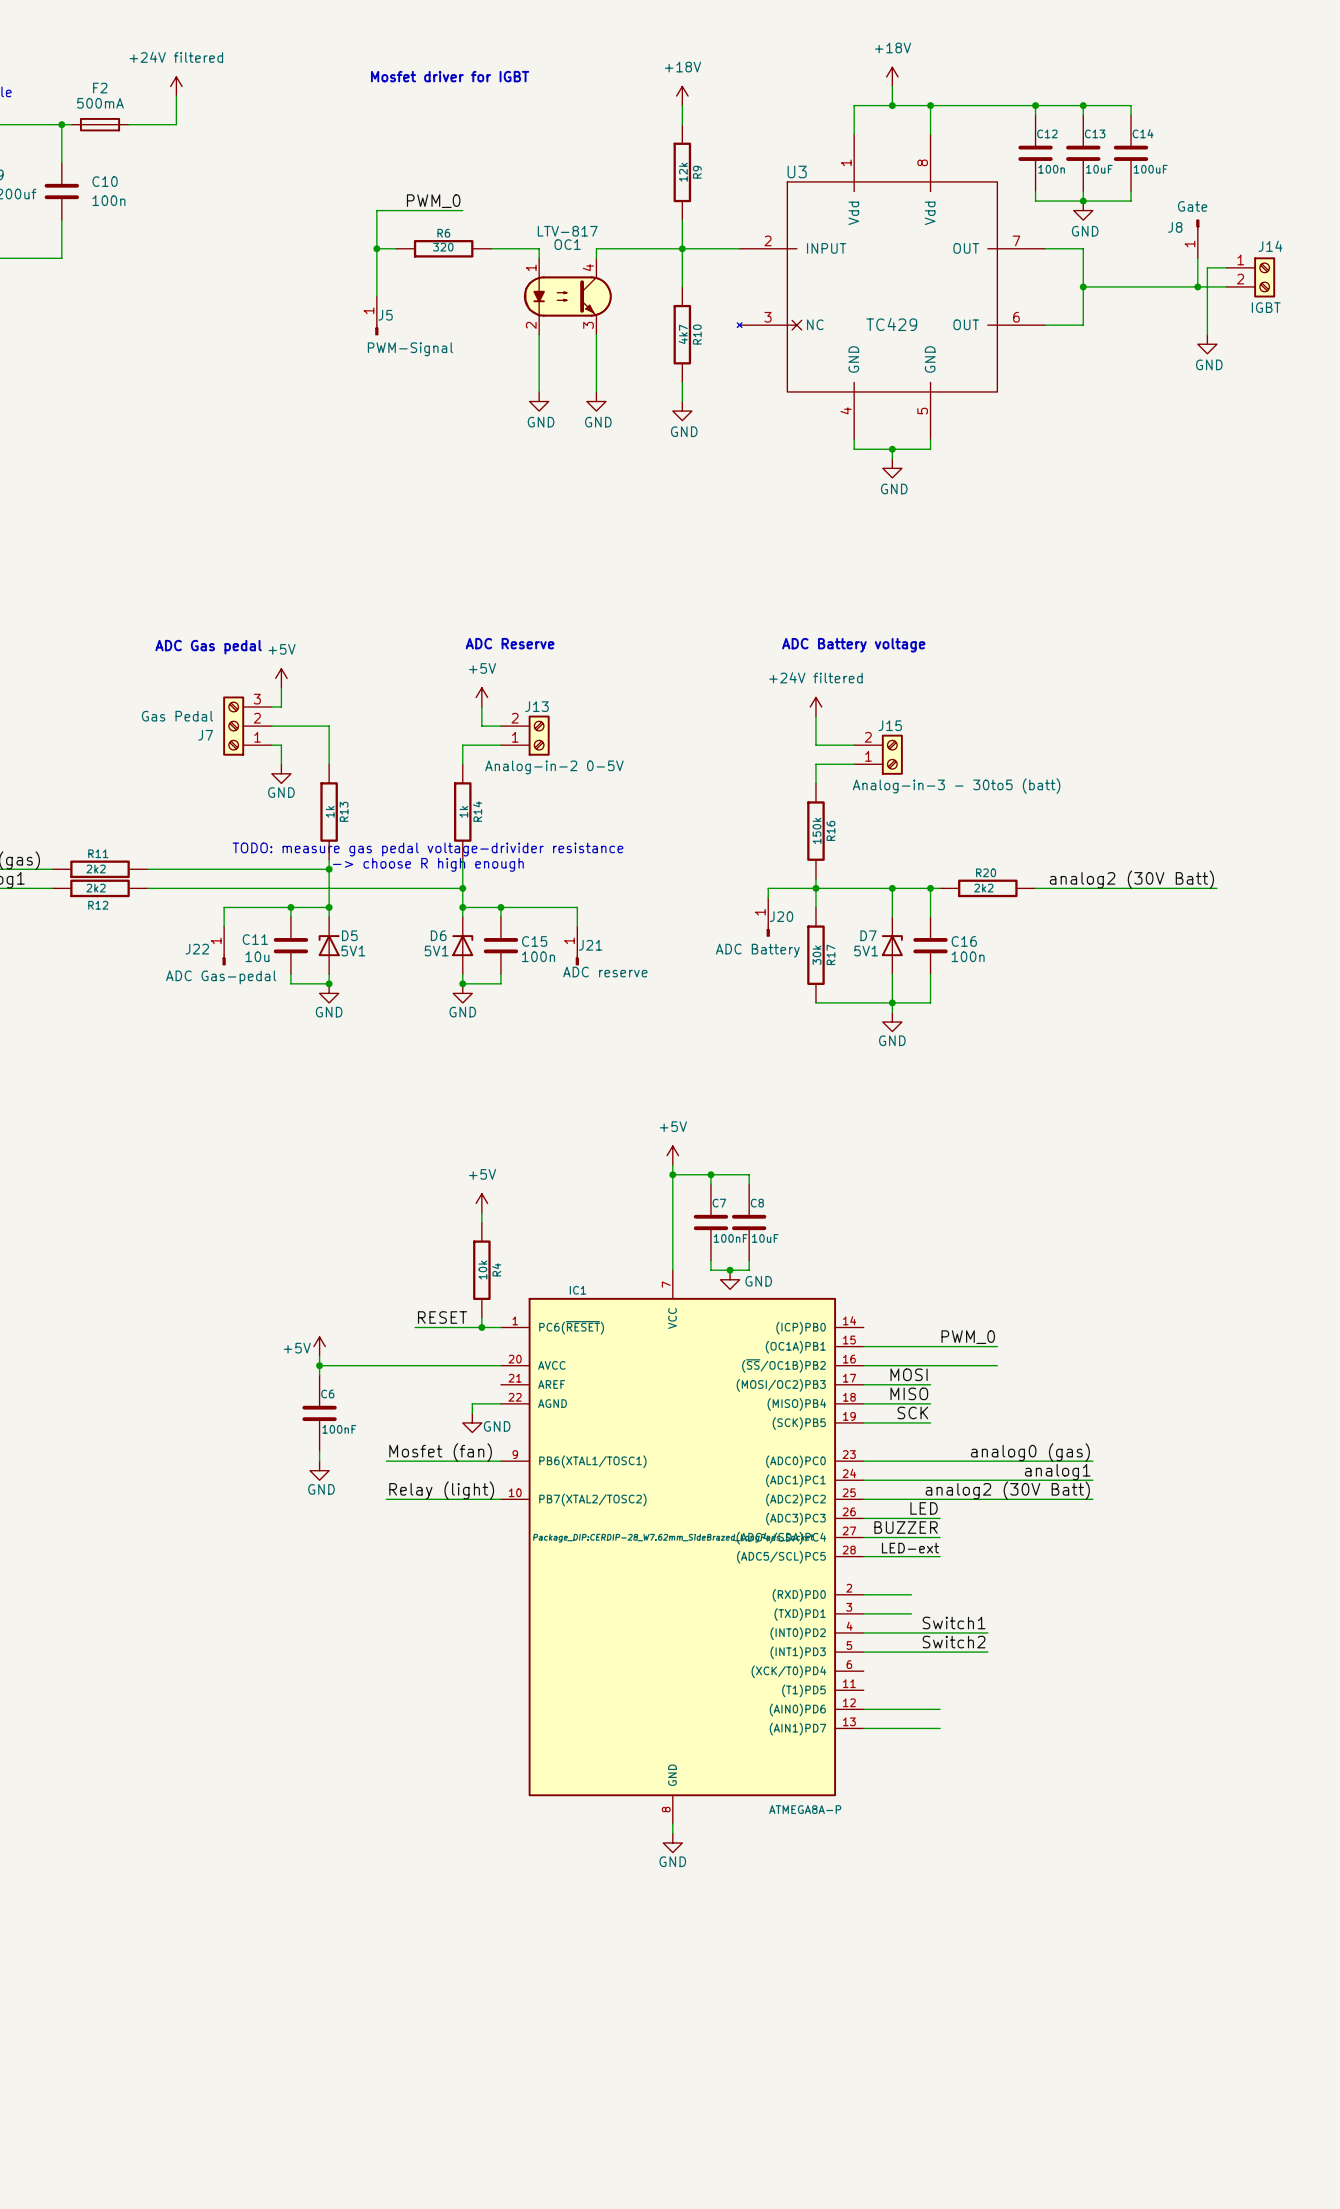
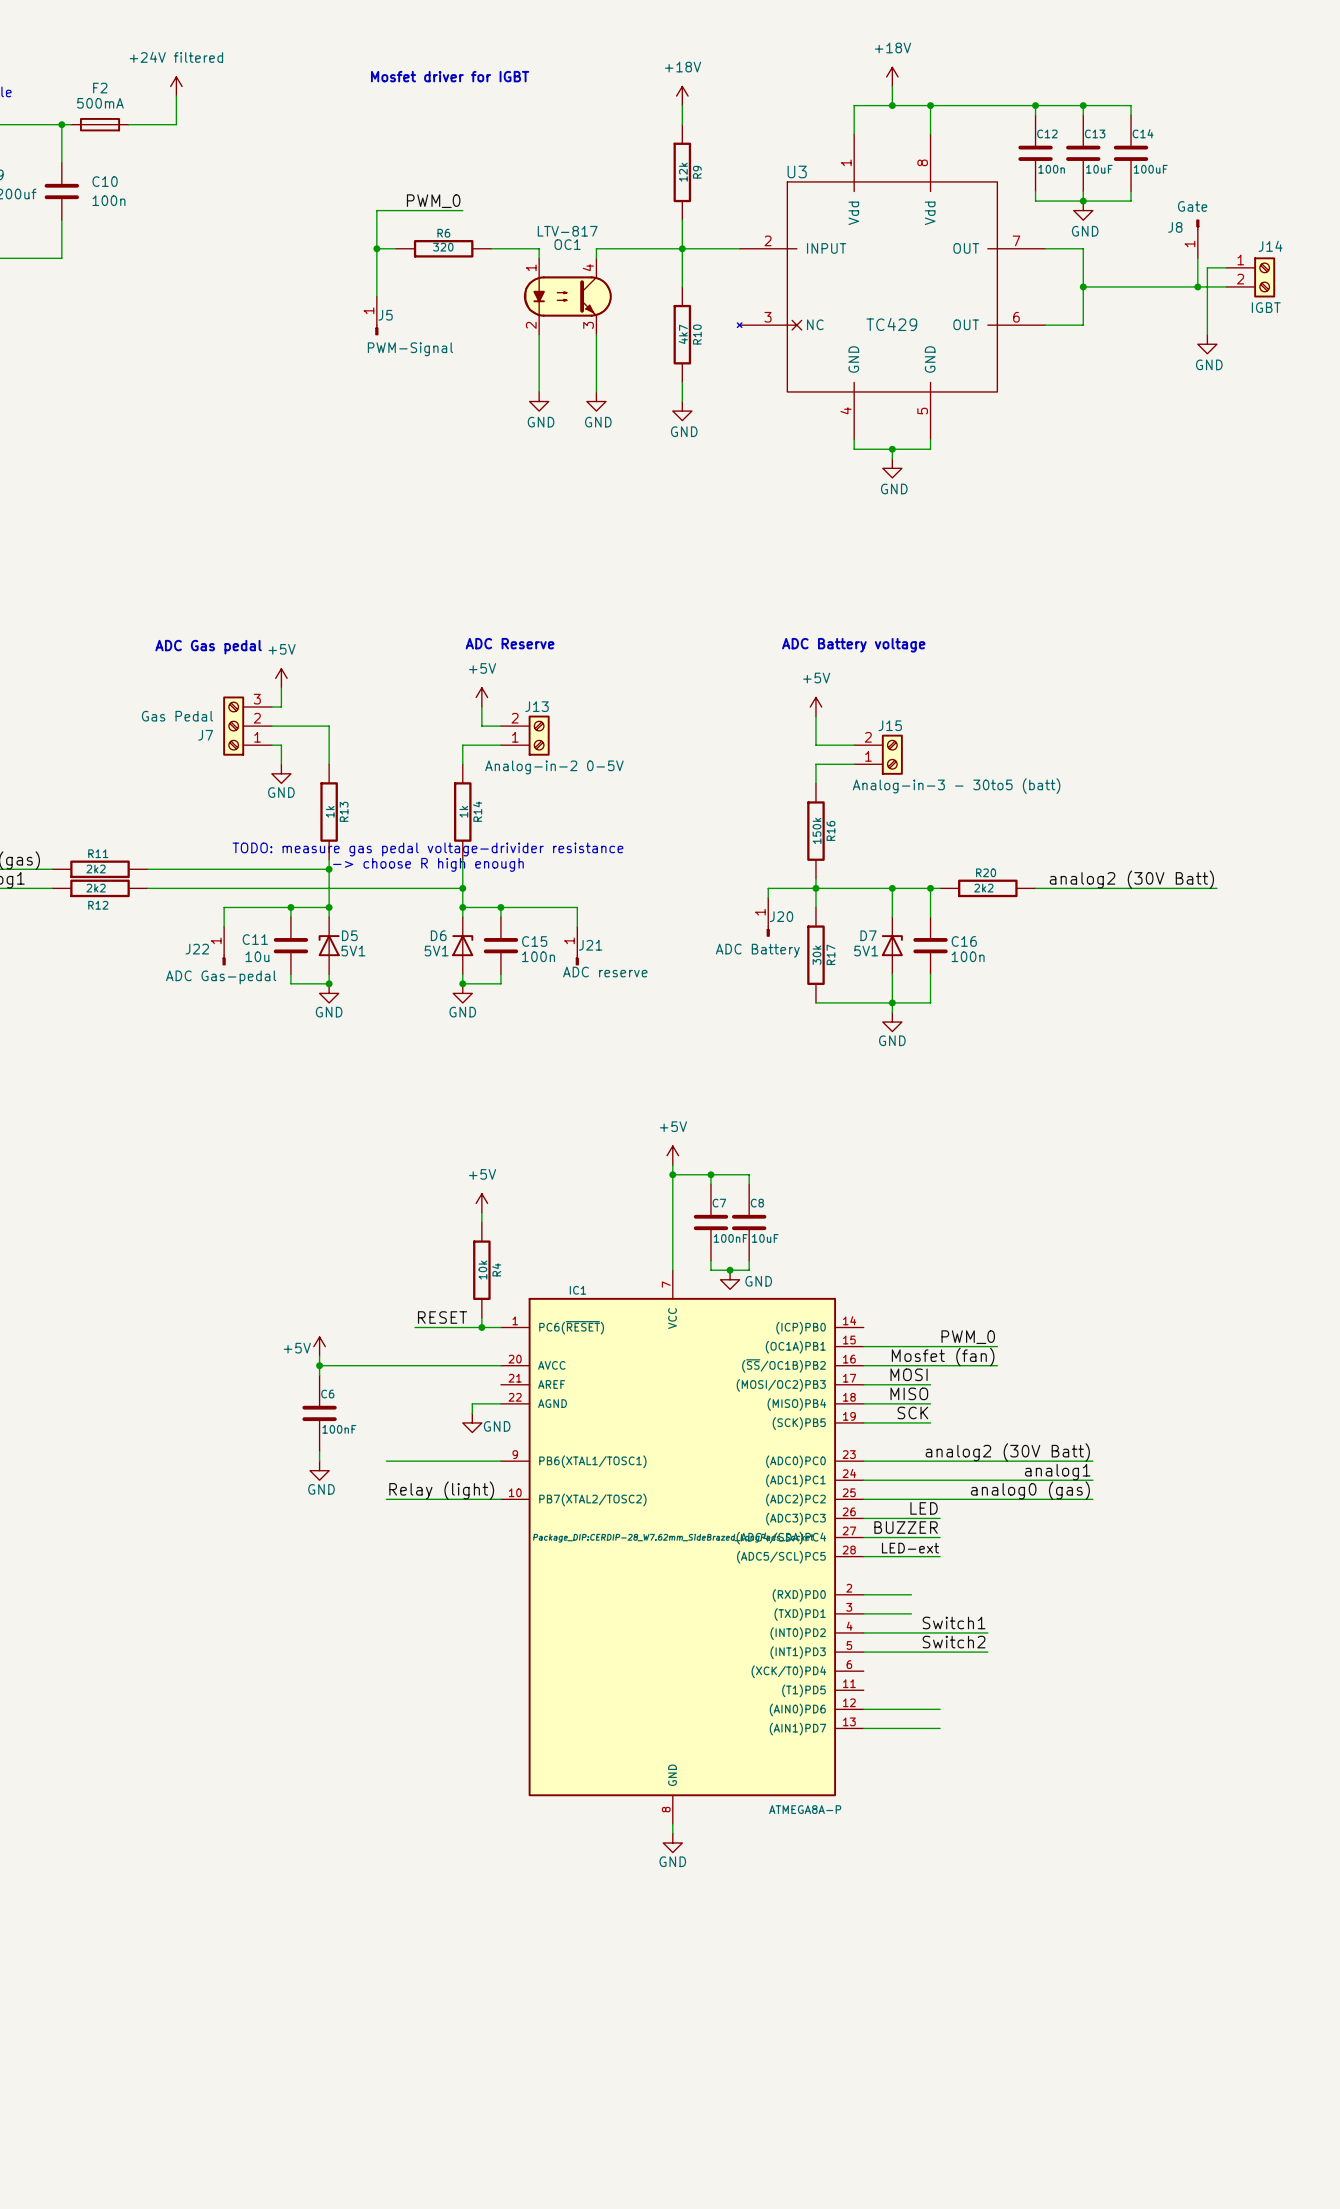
power symbol: +24V filtered (815, 707) -> +5V (815, 707)
label: none -> Mosfet (fan) (943, 1357)
label: Mosfet (fan) (440, 1452) -> none
label: analog0 (gas) (1030, 1452) -> analog2 (30V Batt) (1007, 1452)
label: analog2 (30V Batt) (1007, 1490) -> analog0 (gas) (1030, 1490)

